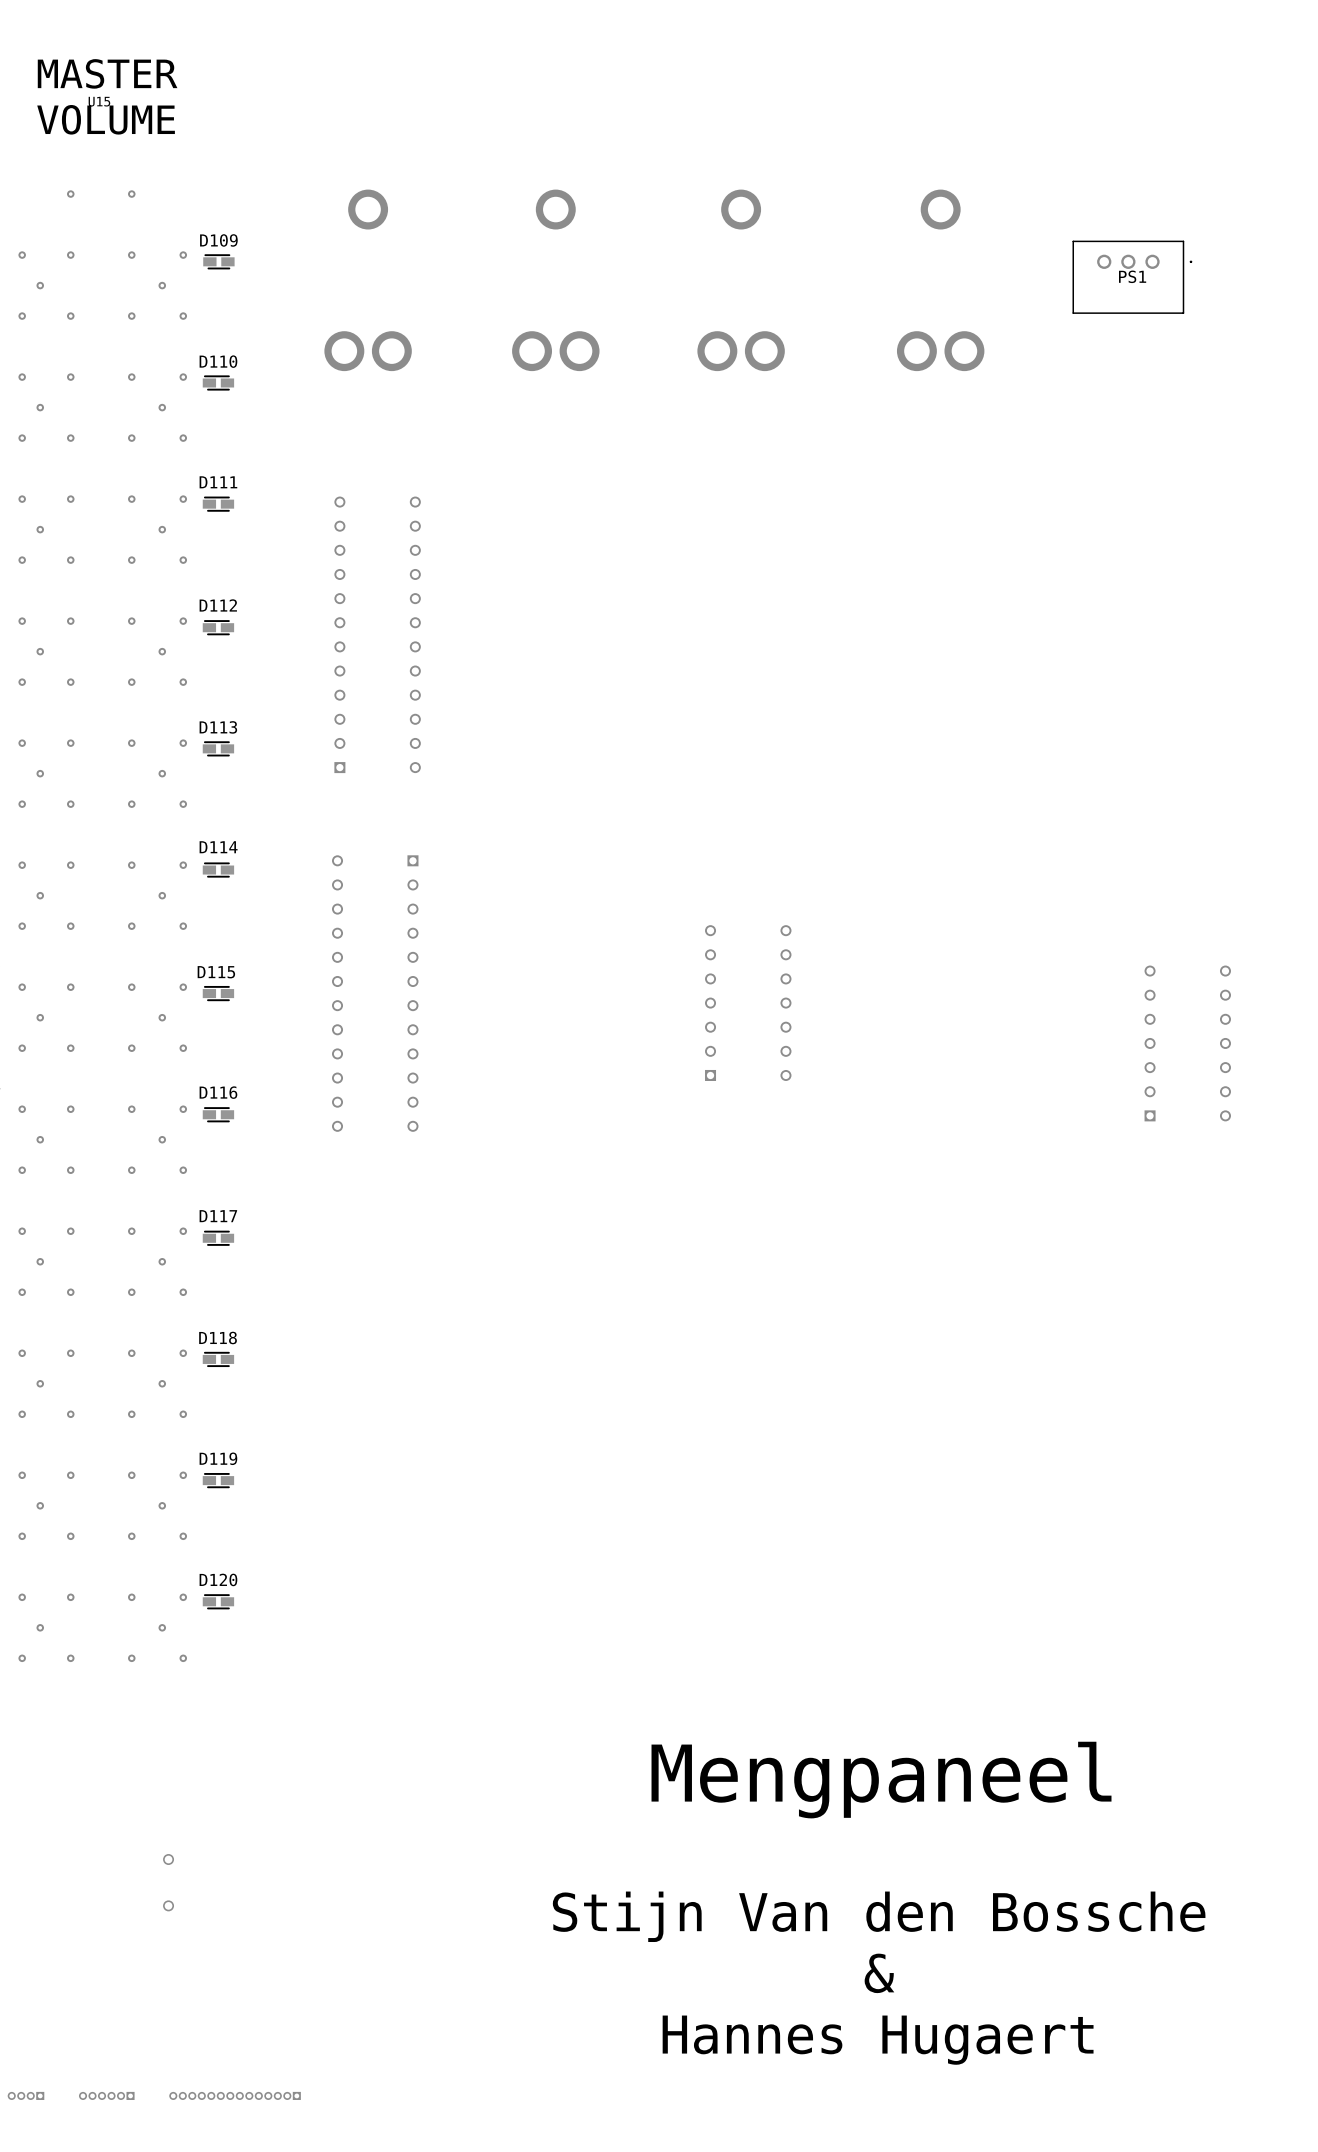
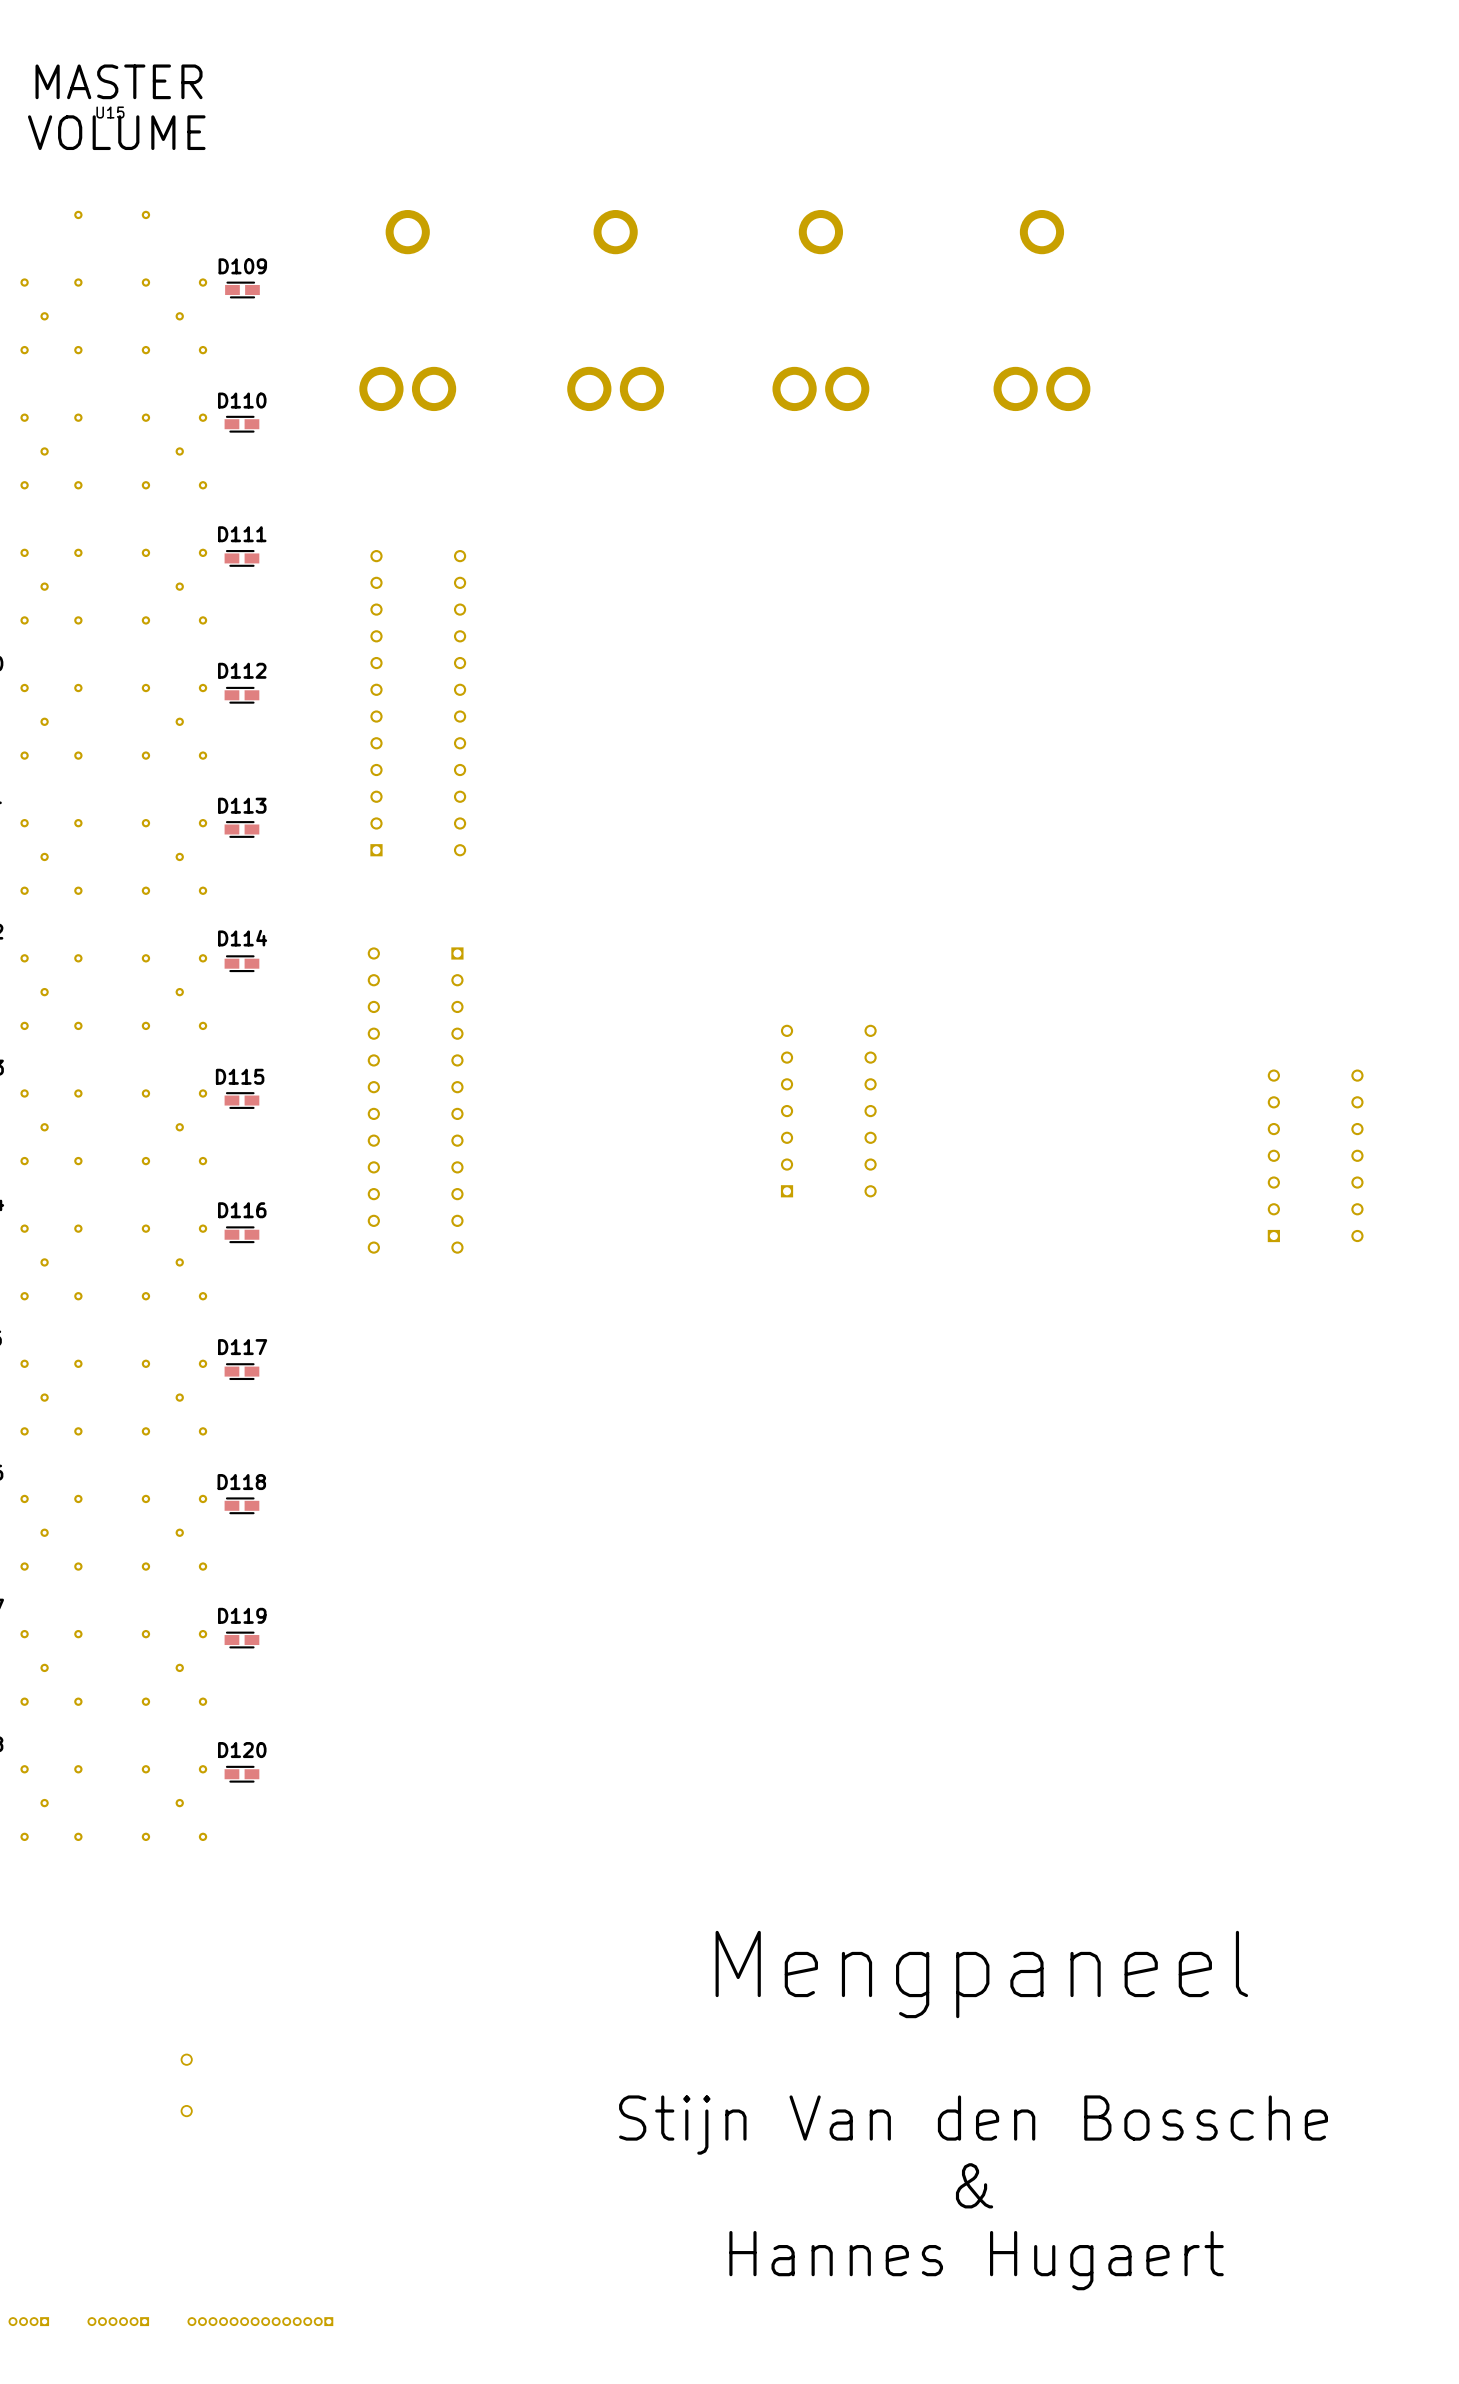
PS1: (1132, 277) -> none

